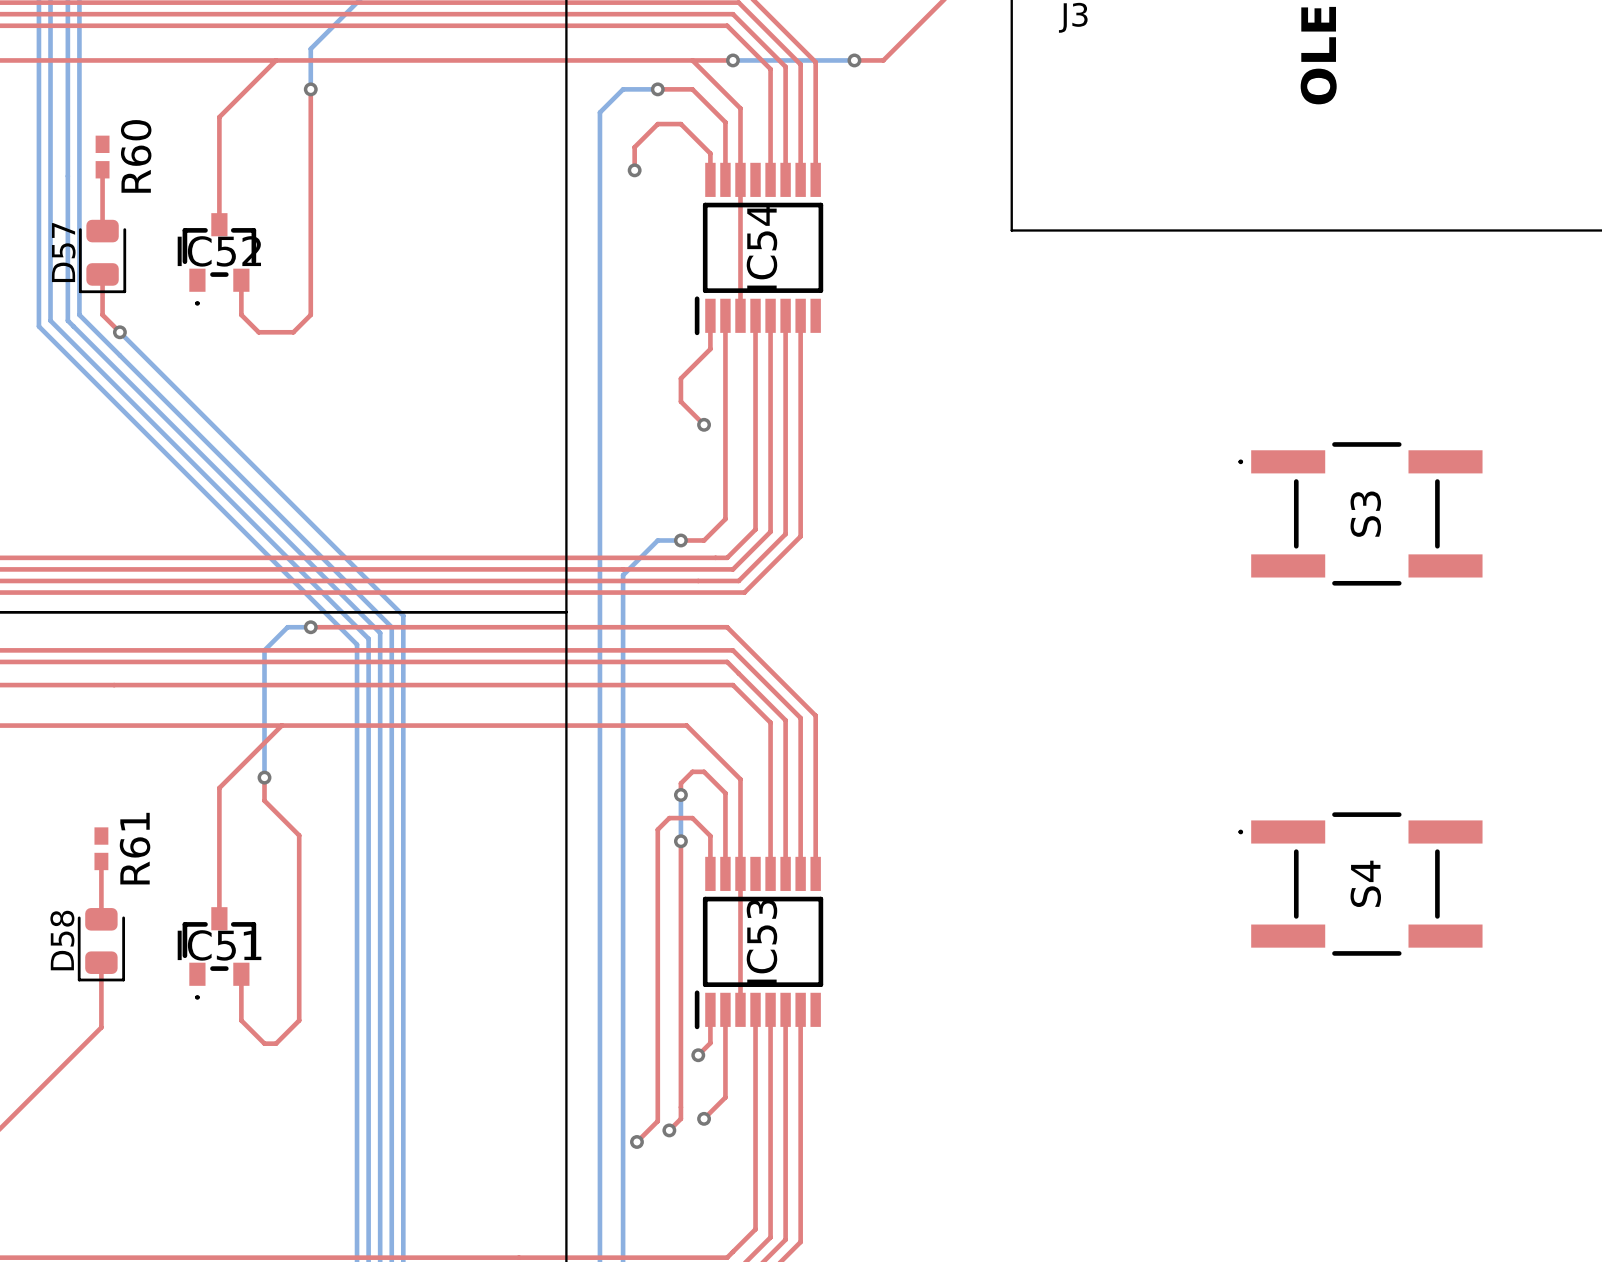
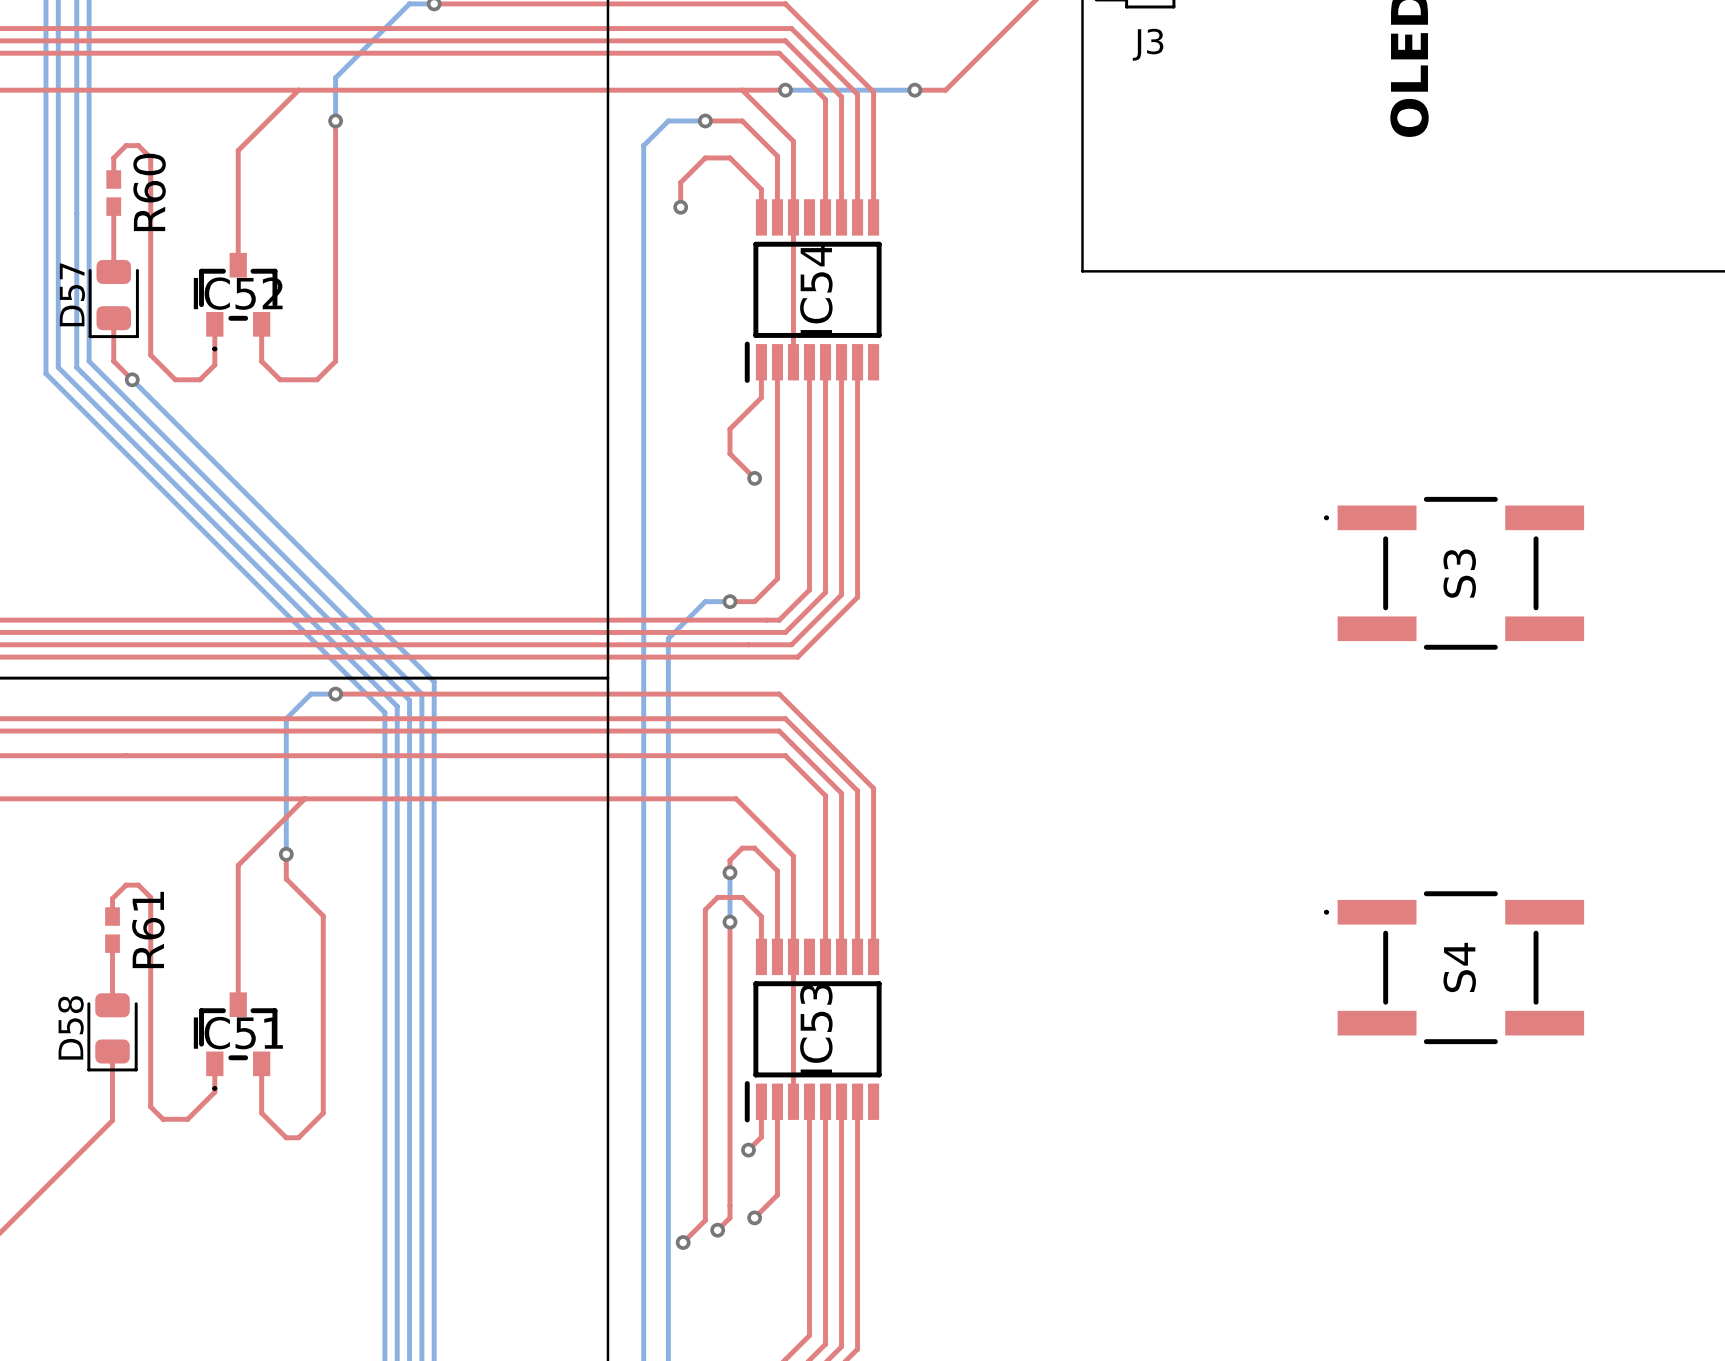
top track: none -> (113, 179) (113, 157) (126, 145) (138, 145) (150, 157) (150, 355) (175, 379) (200, 379) (214, 365) (214, 324)
top track: none -> (112, 916) (112, 898) (126, 885) (138, 885) (150, 897) (150, 1106) (163, 1119) (187, 1119) (214, 1092) (214, 1063)

